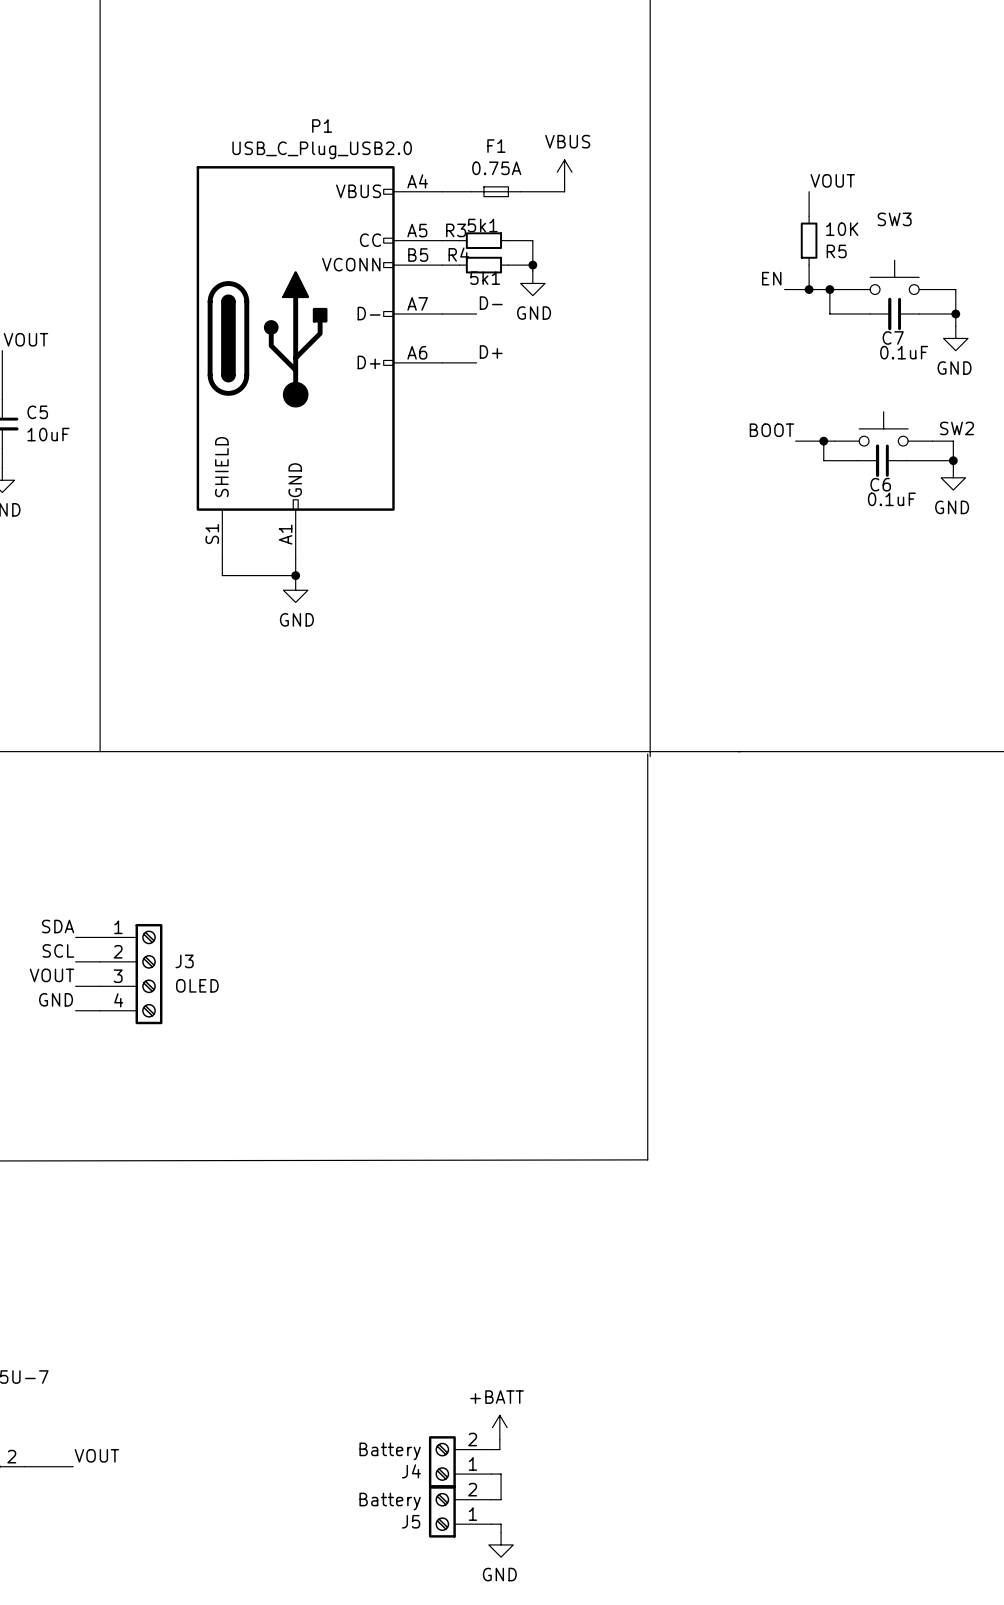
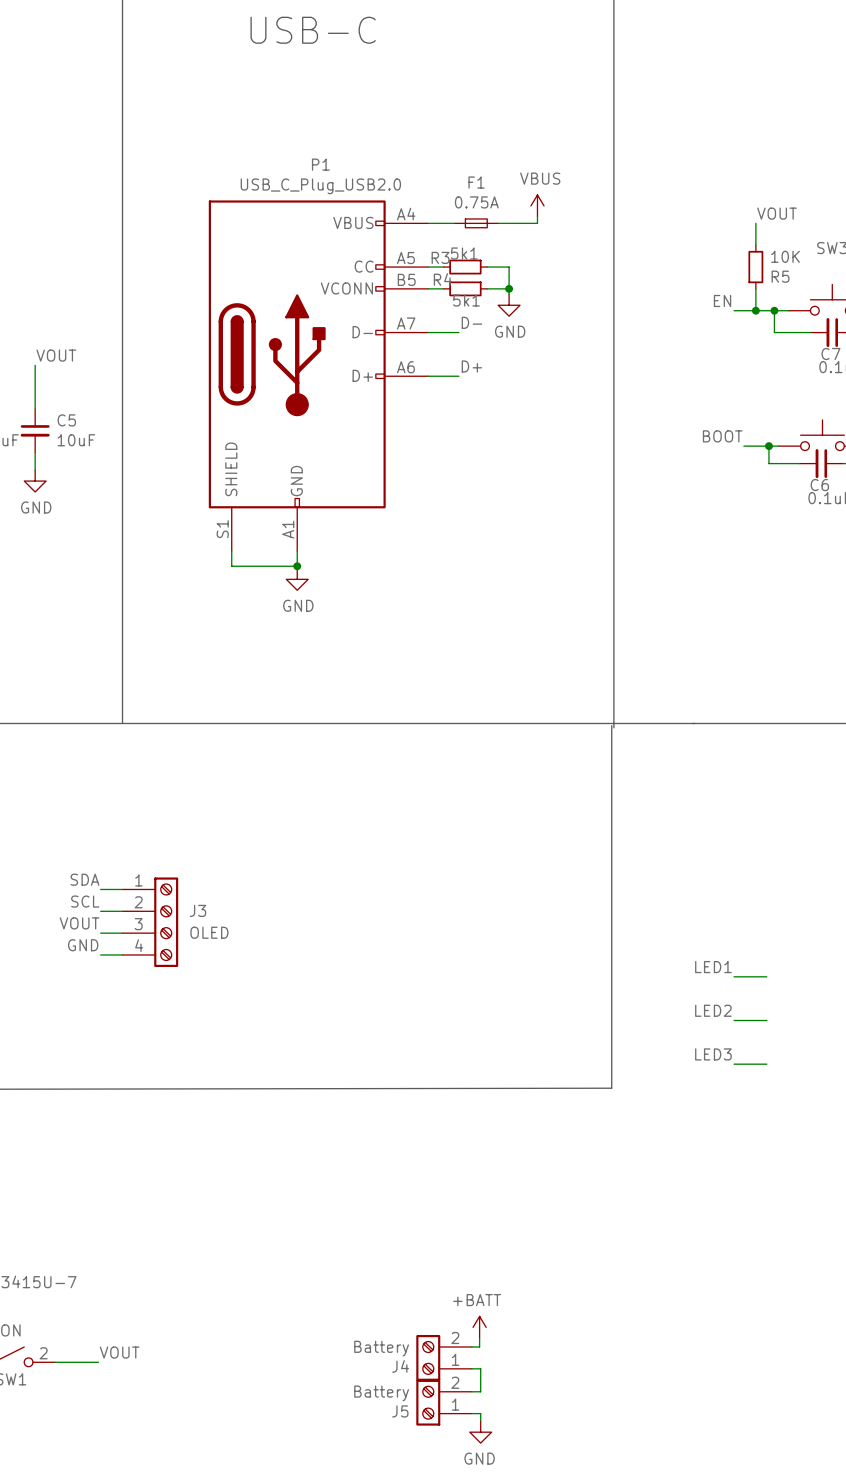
label: none -> LED1 (713, 967)
wire: none -> (734, 976) (766, 976)
label: none -> LED2 (713, 1010)
wire: none -> (734, 1020) (766, 1020)
label: none -> LED3 (713, 1054)
wire: none -> (734, 1064) (766, 1064)

